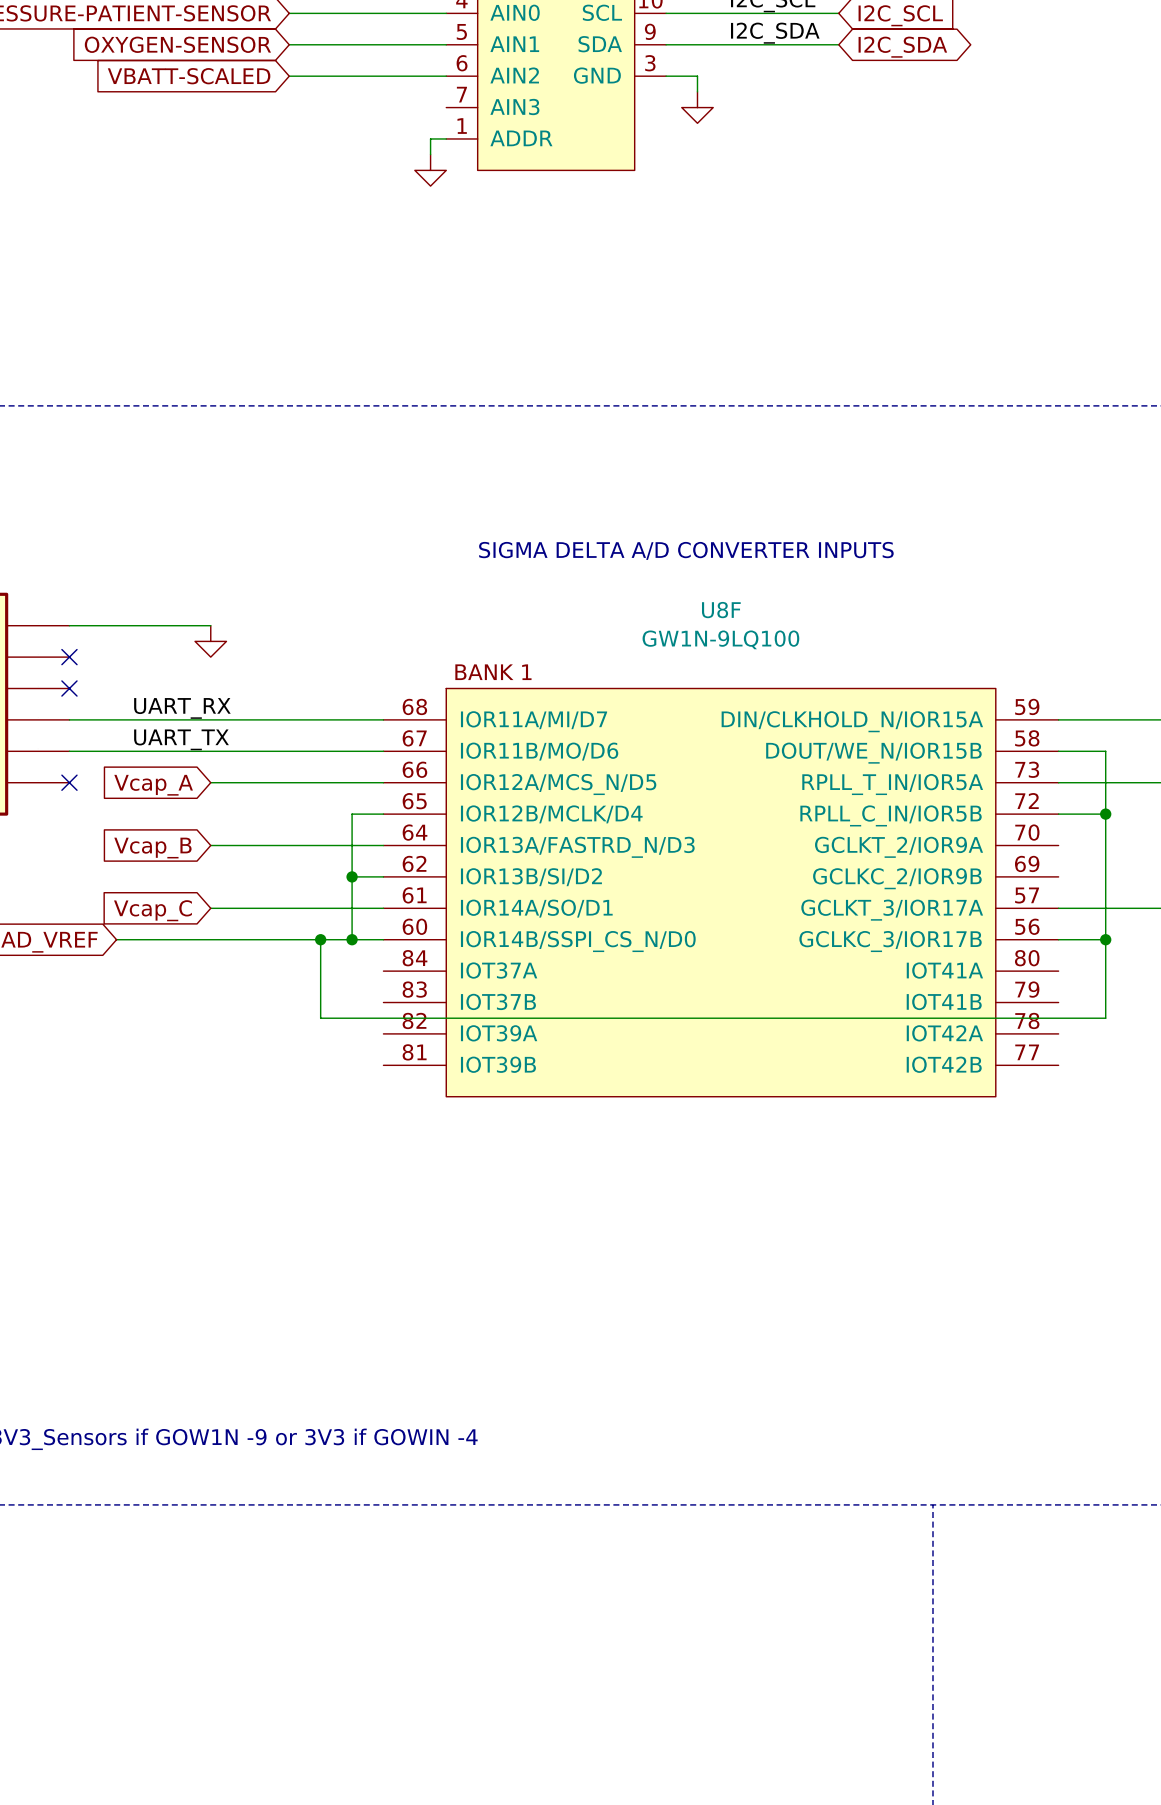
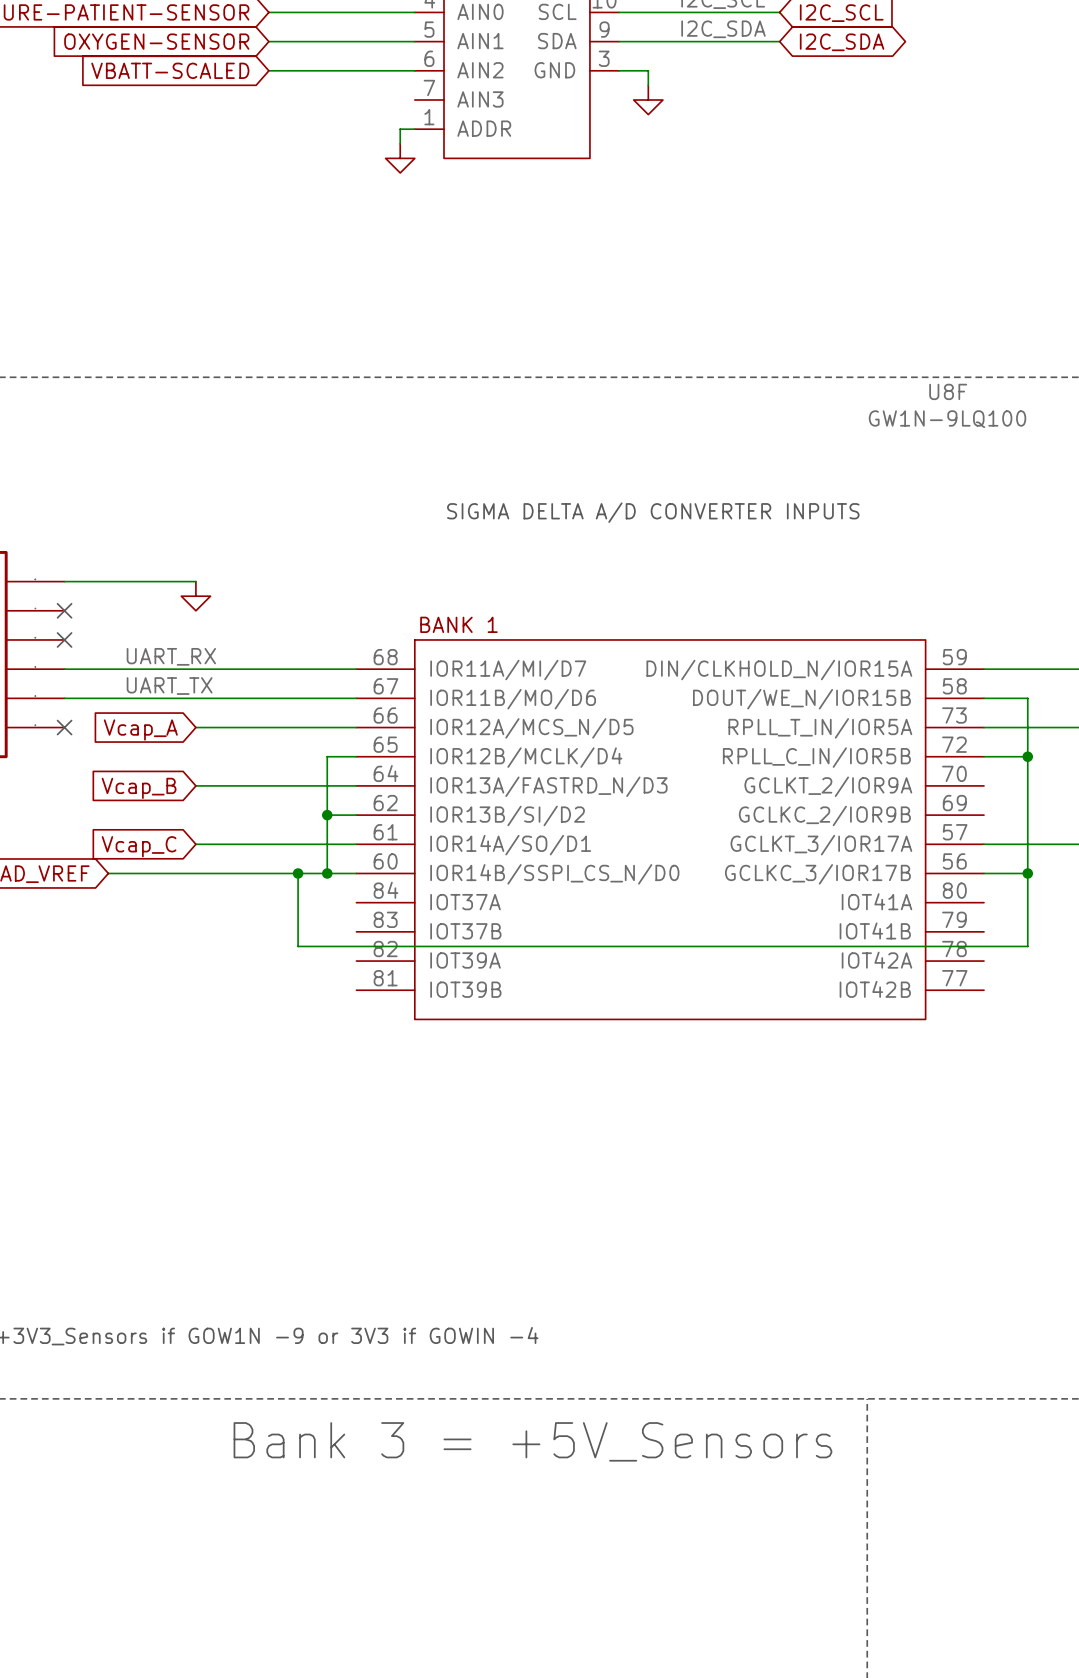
U8F name position: U8F (721, 610) -> U8F (948, 391)
U8F value position: GW1N-9LQ100 (720, 639) -> GW1N-9LQ100 (947, 419)
text: none -> Bank 3 = +5V_Sensors (532, 1441)

